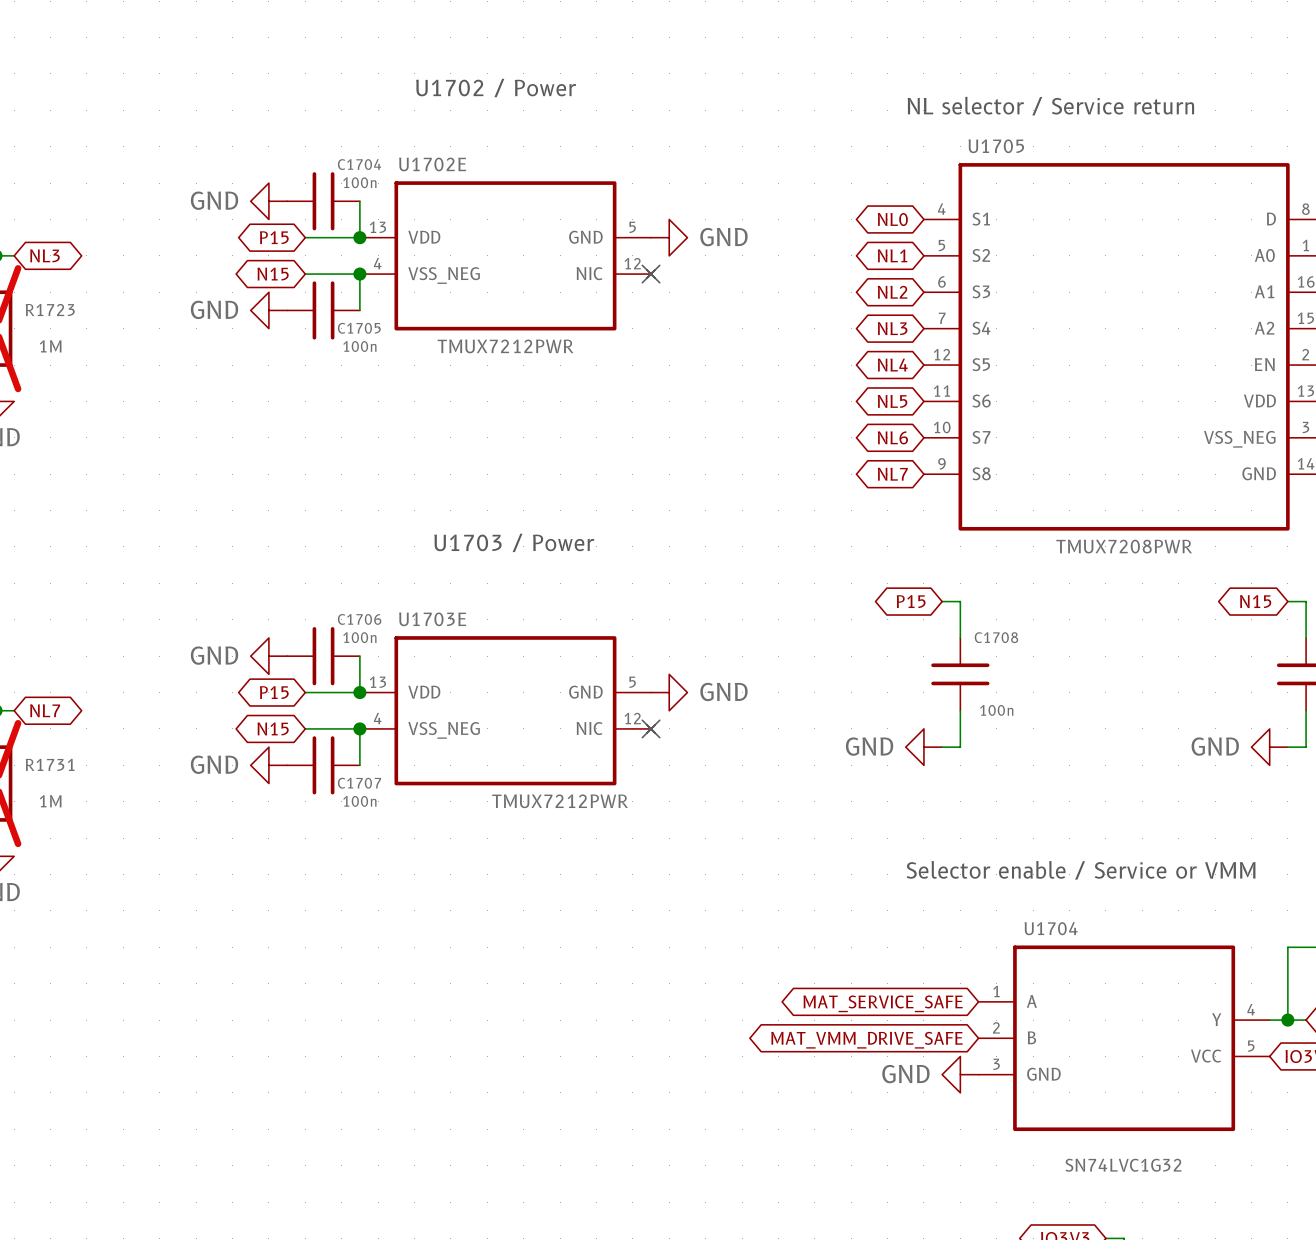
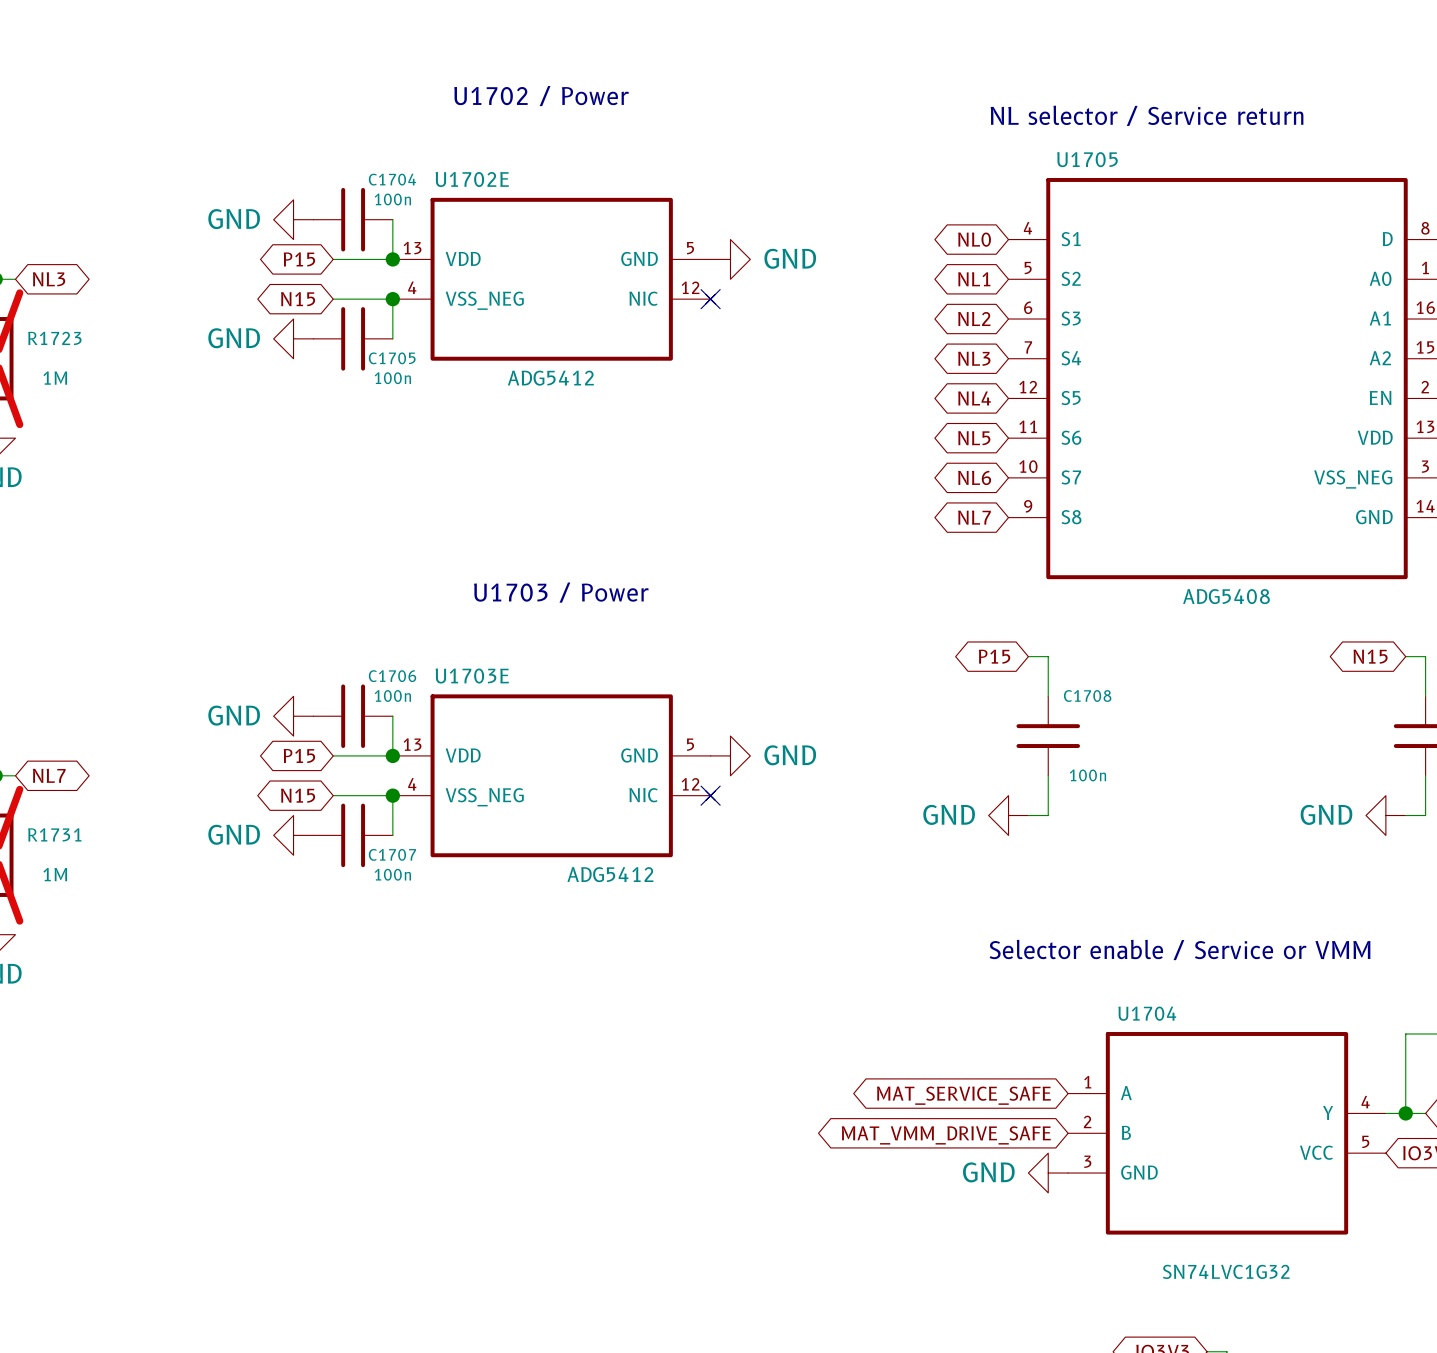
U1702E value: TMUX7212PWR (505, 346) -> ADG5412 (550, 378)
U1705 value: TMUX7208PWR (1124, 546) -> ADG5408 (1226, 596)
U1703E value: TMUX7212PWR (560, 801) -> ADG5412 (610, 874)

